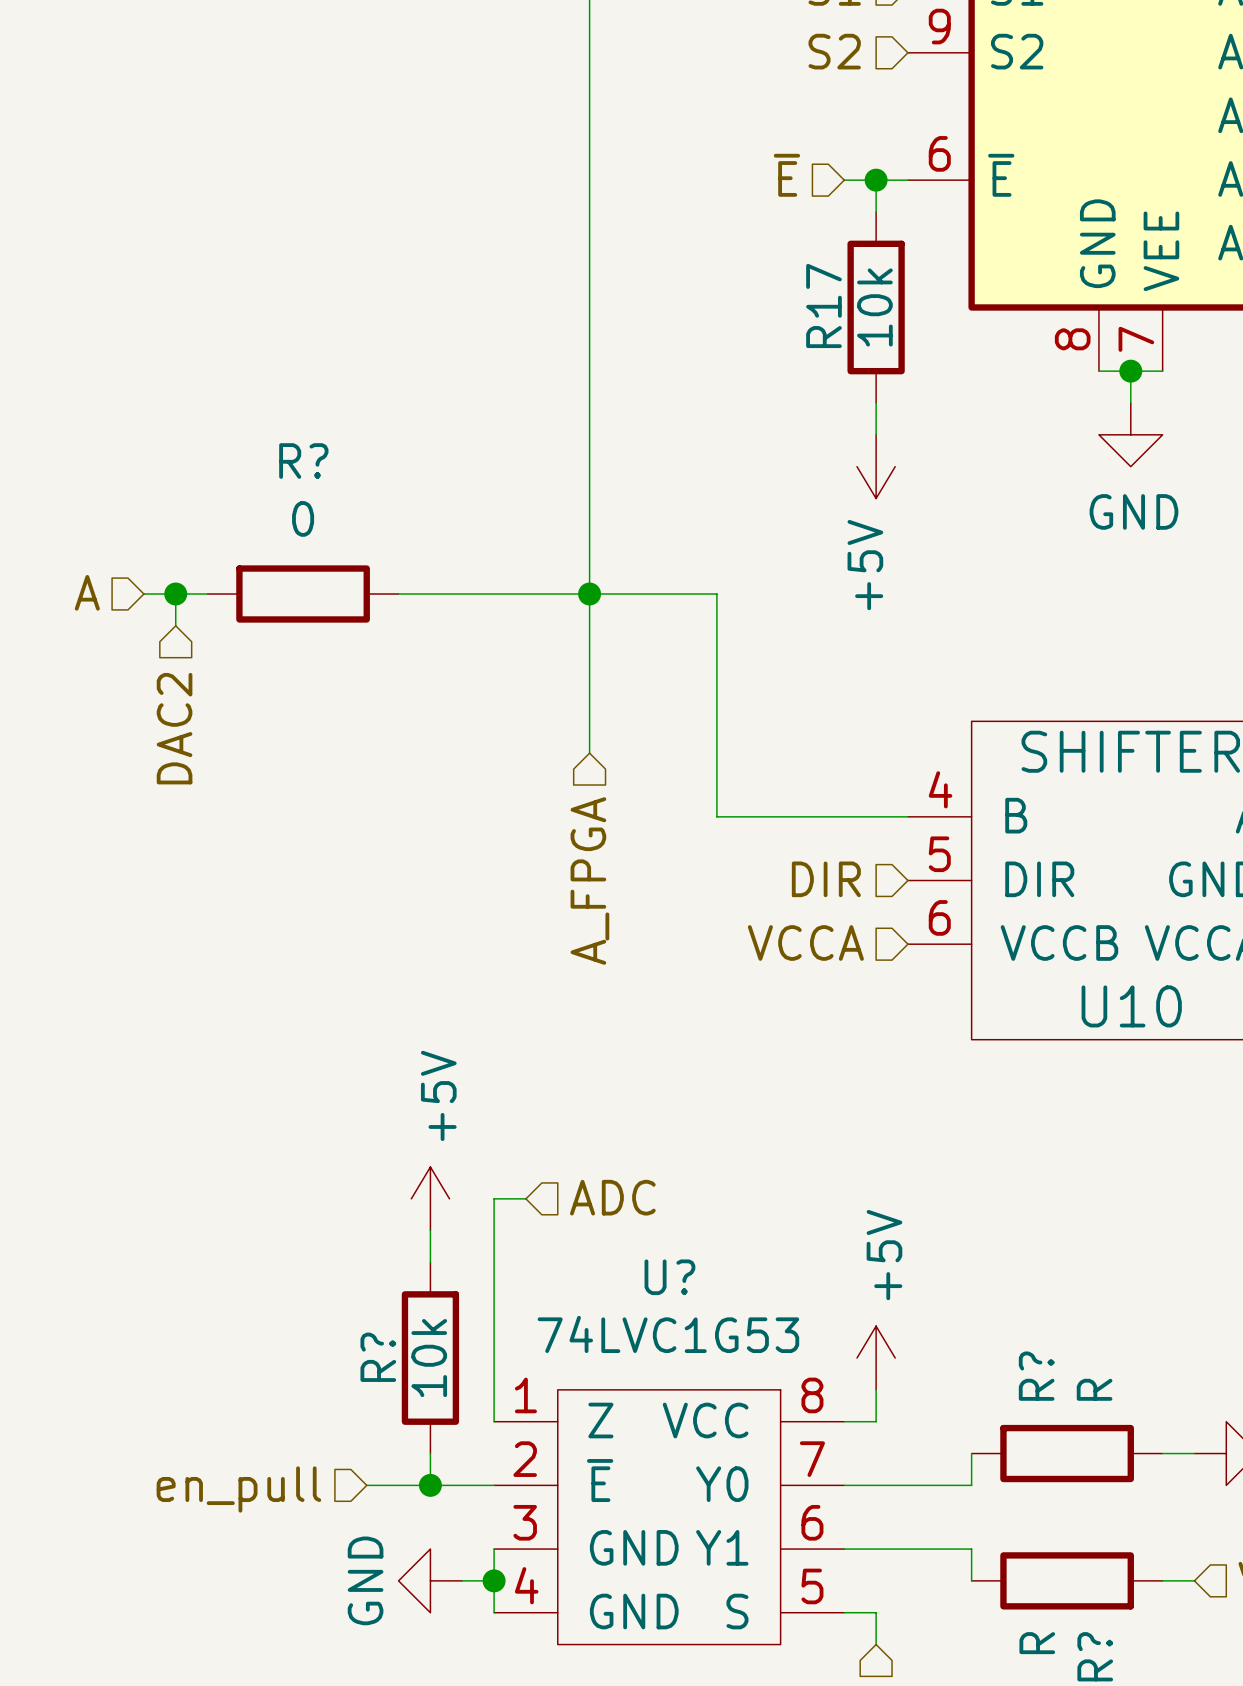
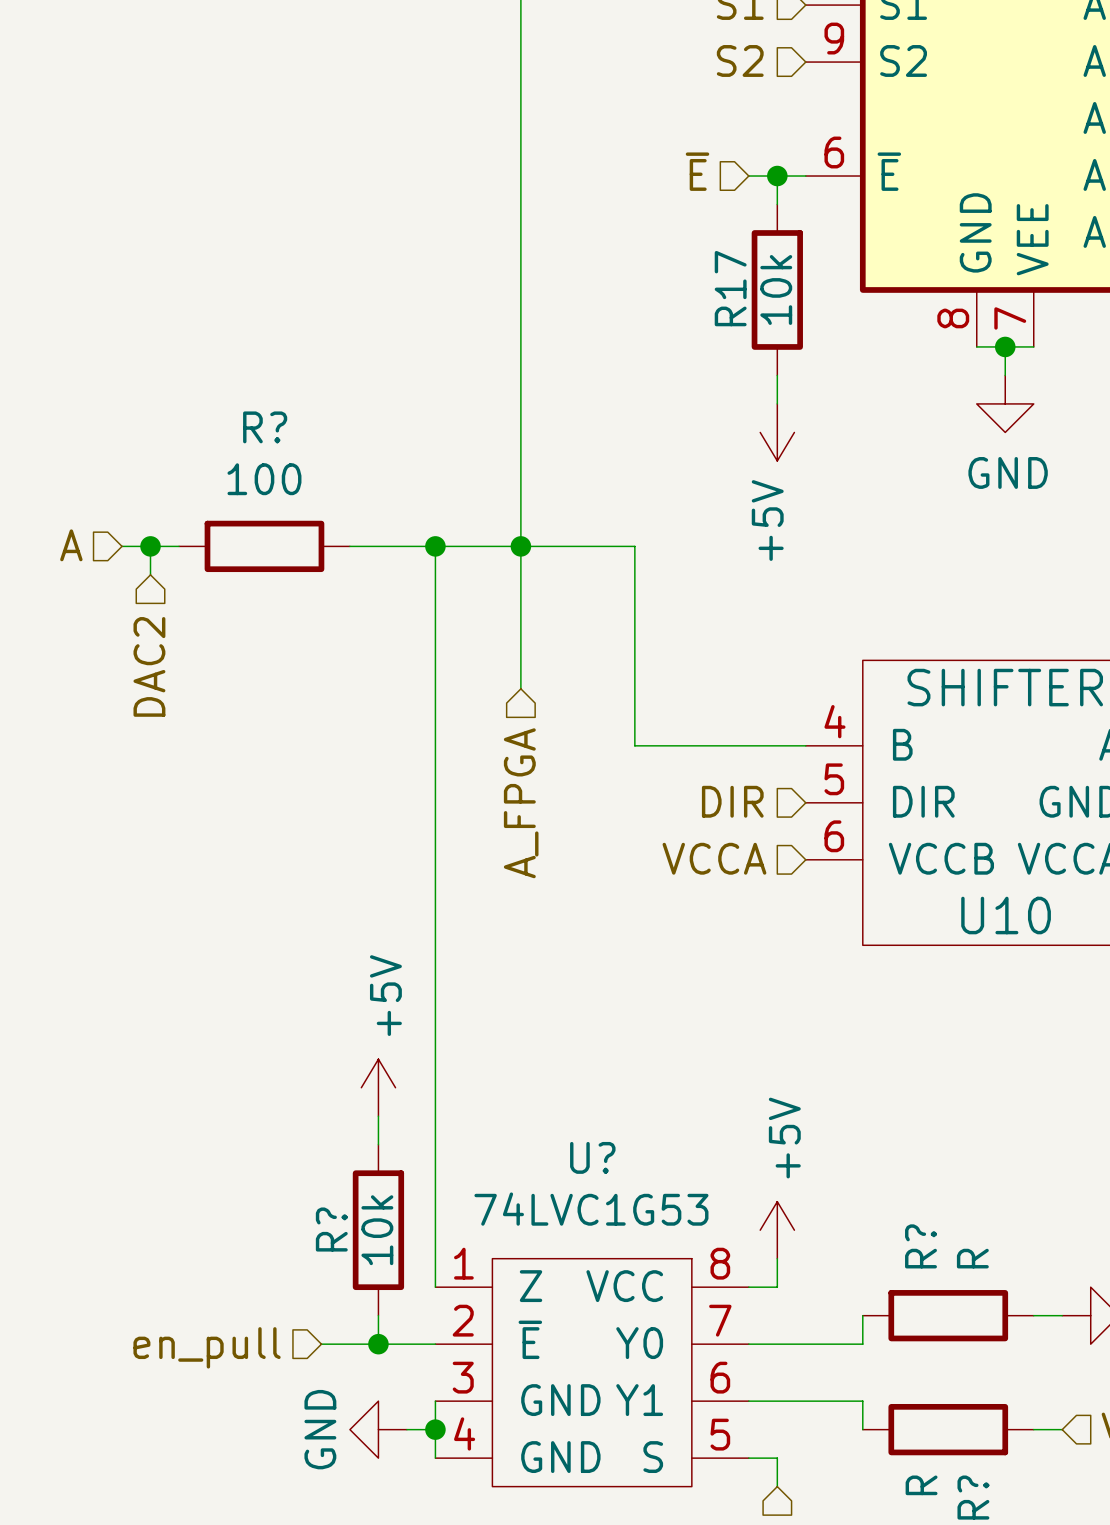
R? value: 0 (303, 518) -> 100 (264, 479)
junction: none -> (435, 546)
hierarchical label: ADC (612, 1197) -> none
wire: (494, 1198) (525, 1198) -> (435, 1087) (435, 546)

